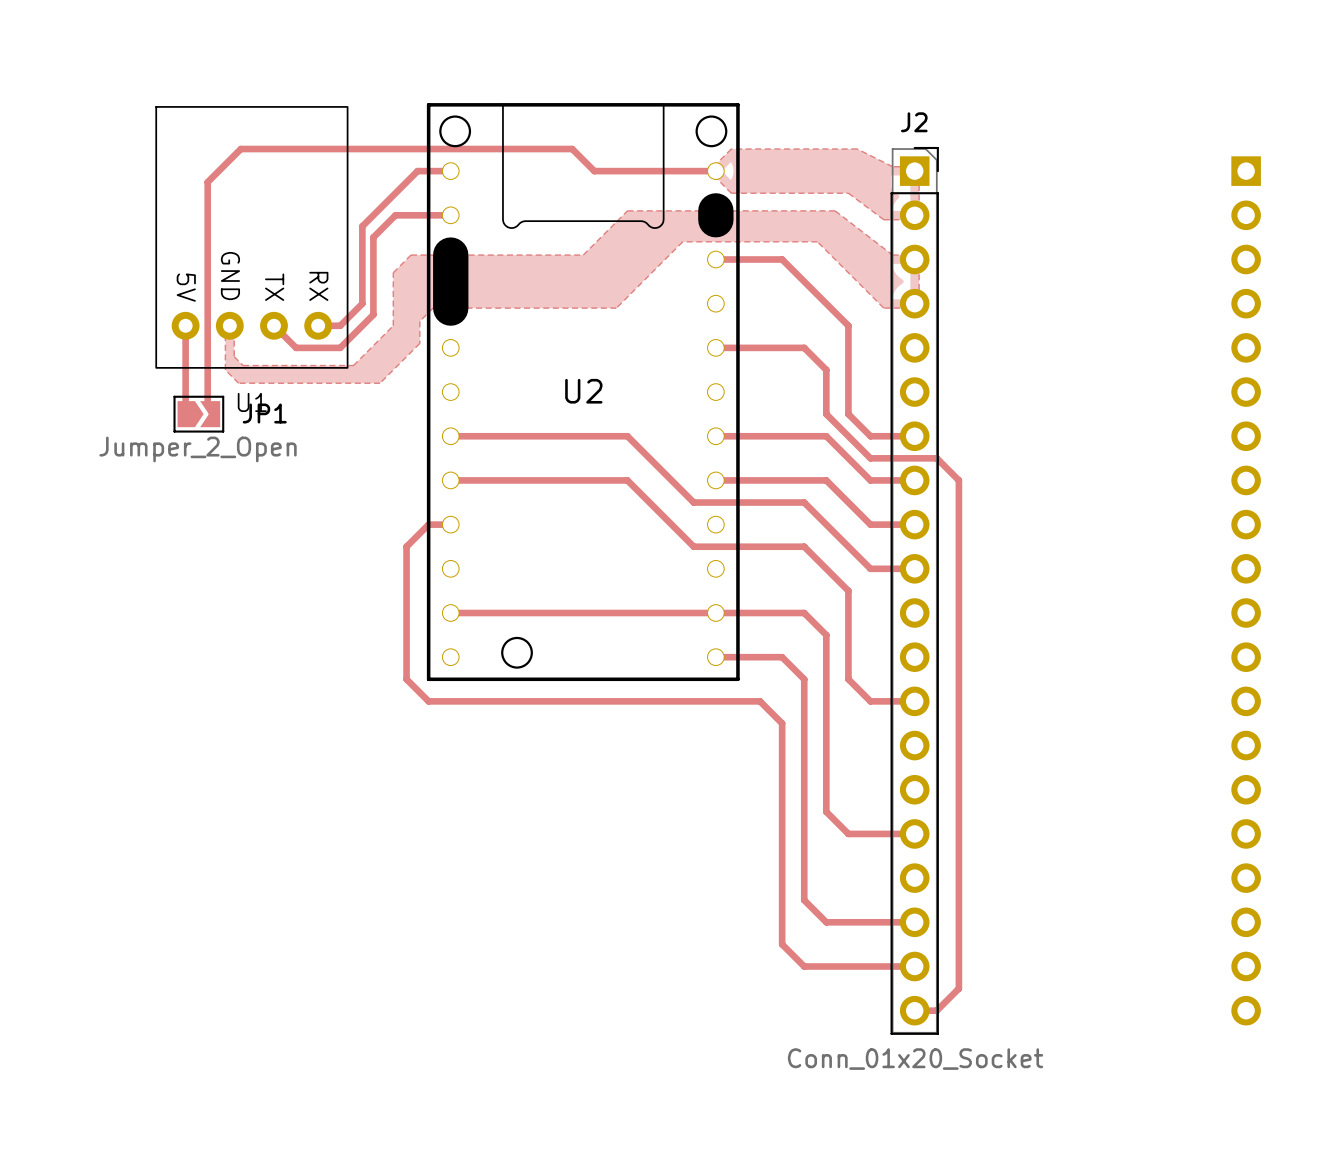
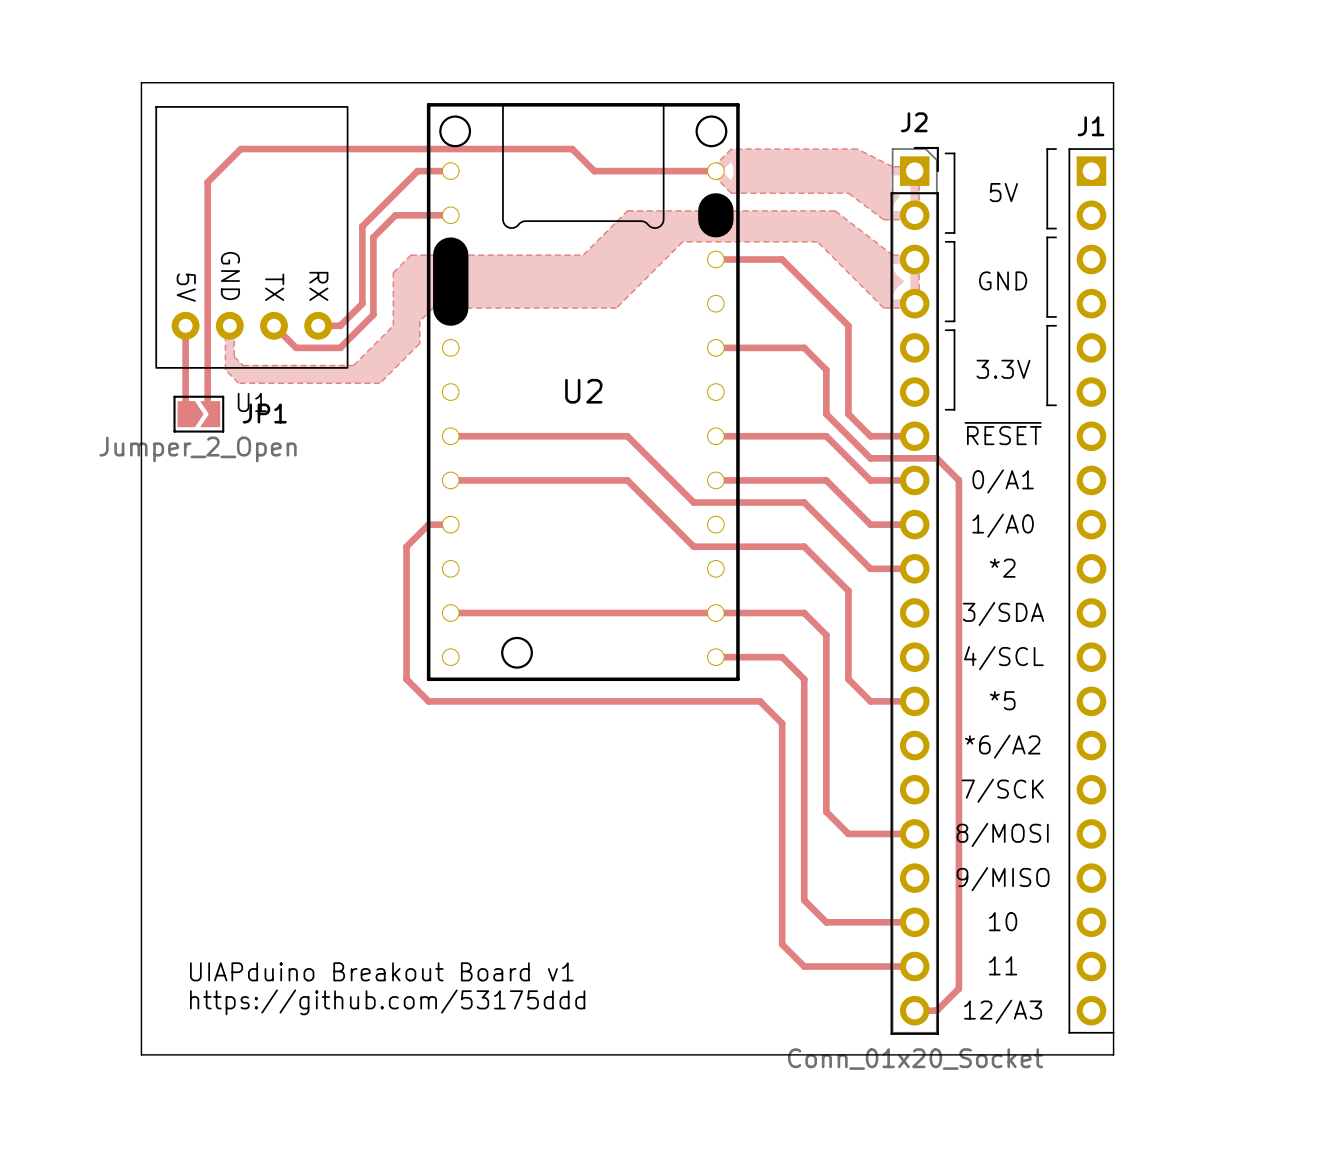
board edge: none -> (141, 82) (1113, 82) (1113, 1054) (141, 1054) (141, 82)
line: none -> (1056, 149) (1047, 149) (1047, 228) (1056, 228)
line: none -> (1113, 149) (1069, 149) (1069, 1032) (1113, 1032)
line: none -> (945, 153) (954, 153) (954, 232) (945, 232)
text: none -> 5V (1003, 192)
line: none -> (1056, 237) (1047, 237) (1047, 316) (1056, 316)
line: none -> (945, 241) (954, 241) (954, 321) (945, 321)
text: none -> GND (1003, 280)
line: none -> (1056, 325) (1047, 325) (1047, 405) (1056, 405)
line: none -> (945, 330) (954, 330) (954, 409) (945, 409)
text: none -> 3.3V (1003, 369)
text: none -> ~{RESET} (1003, 433)
text: none -> 0/A1 (1003, 481)
text: none -> 1/A0 (1003, 525)
text: none -> *2 (1002, 568)
J1: none -> (1091, 590)
part: (1246, 590) -> none
text: none -> 3/SDA (1003, 614)
text: none -> 4/SCL (1003, 658)
text: none -> *5 (1002, 700)
text: none -> *6/A2 (1002, 746)
text: none -> 7/SCK (1002, 790)
text: none -> 8/MOSI (1002, 834)
text: none -> 9/MISO (1003, 879)
text: none -> 10 (1003, 921)
text: none -> 11 (1003, 965)
text: none -> UIAPduino Breakout Board v1 (381, 971)
text: none -> https://github.com/53175ddd (387, 1002)
text: none -> 12/A3 (1003, 1011)

